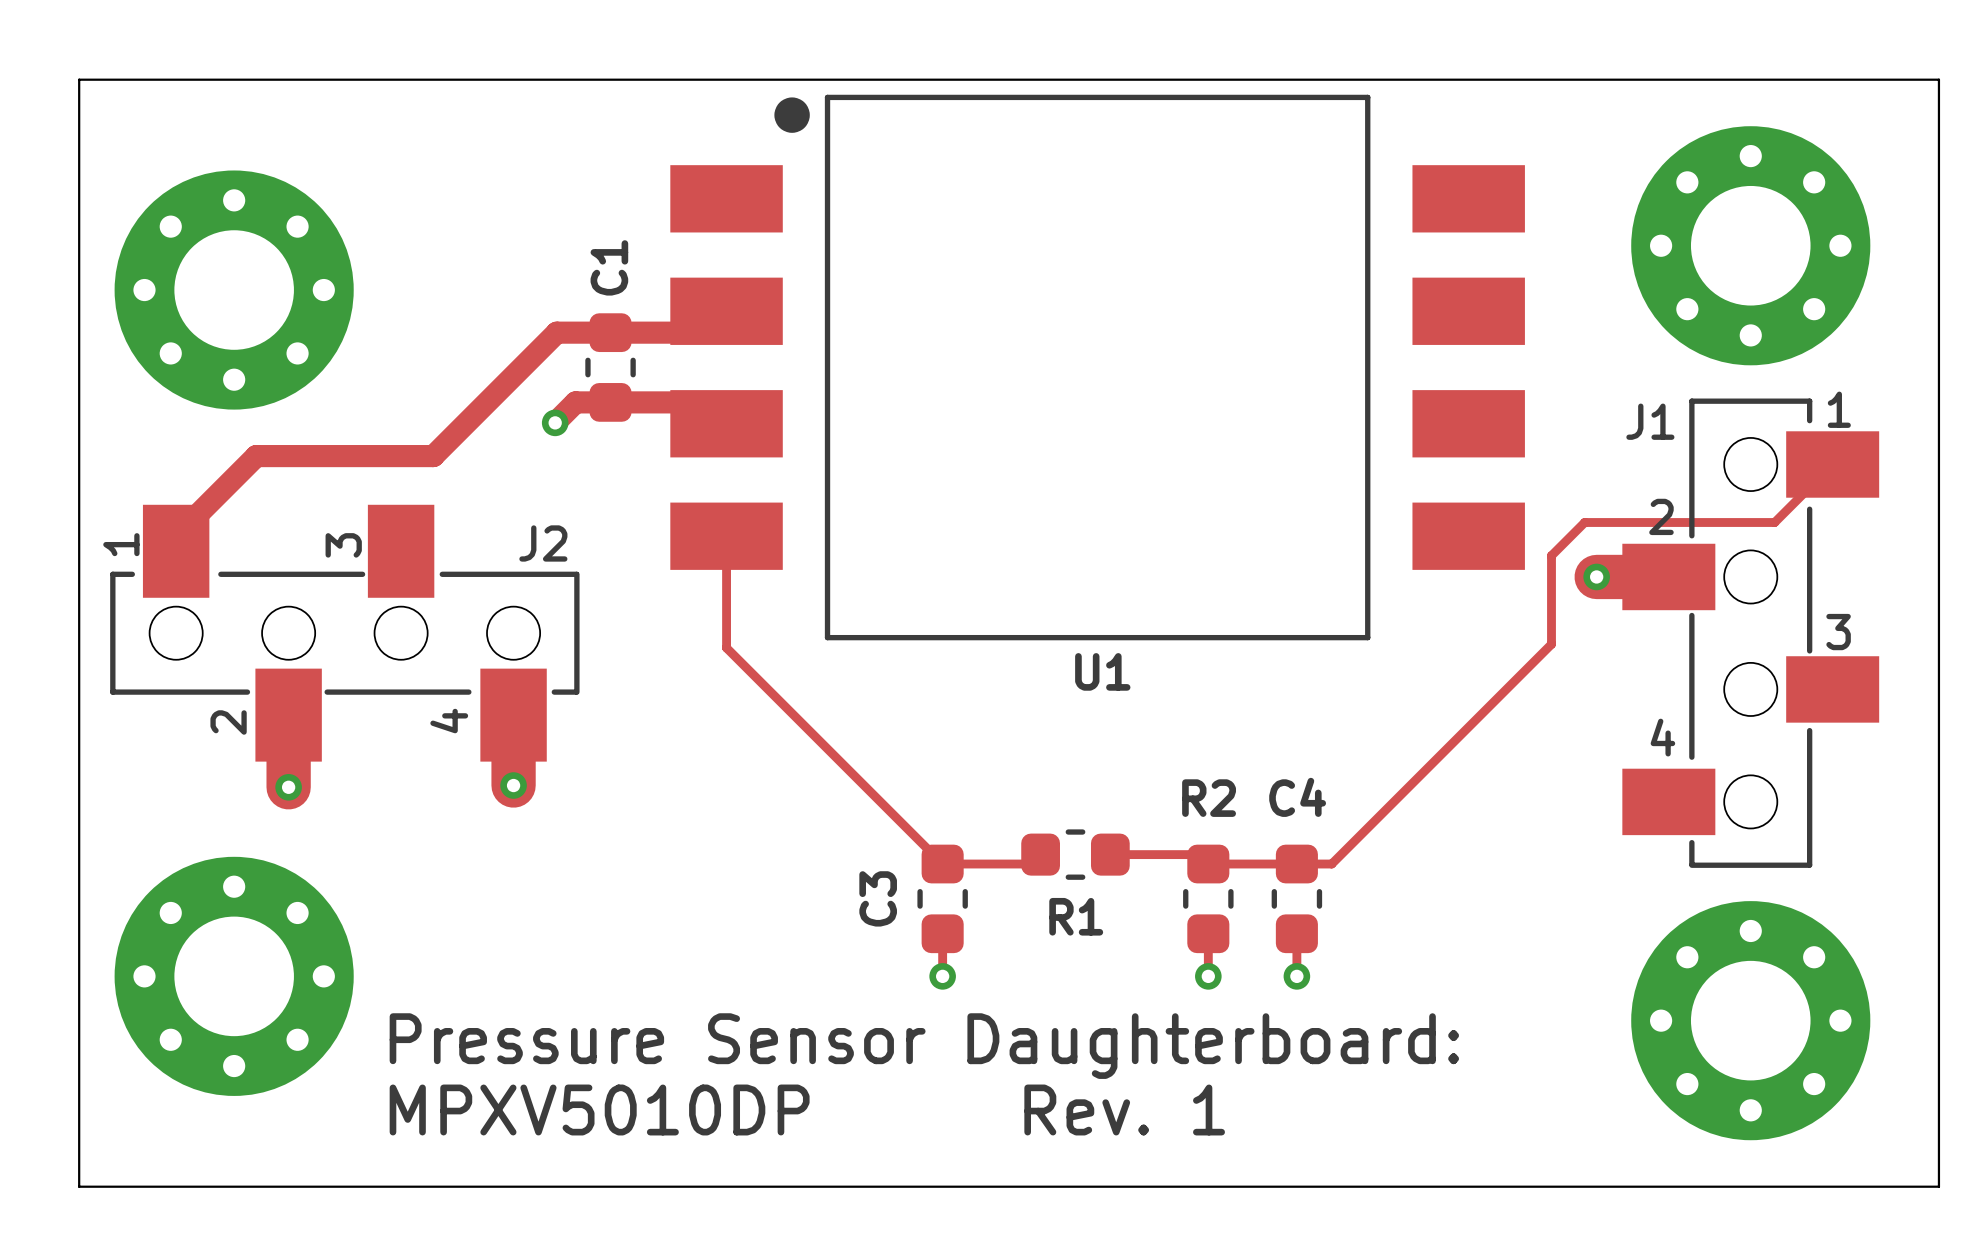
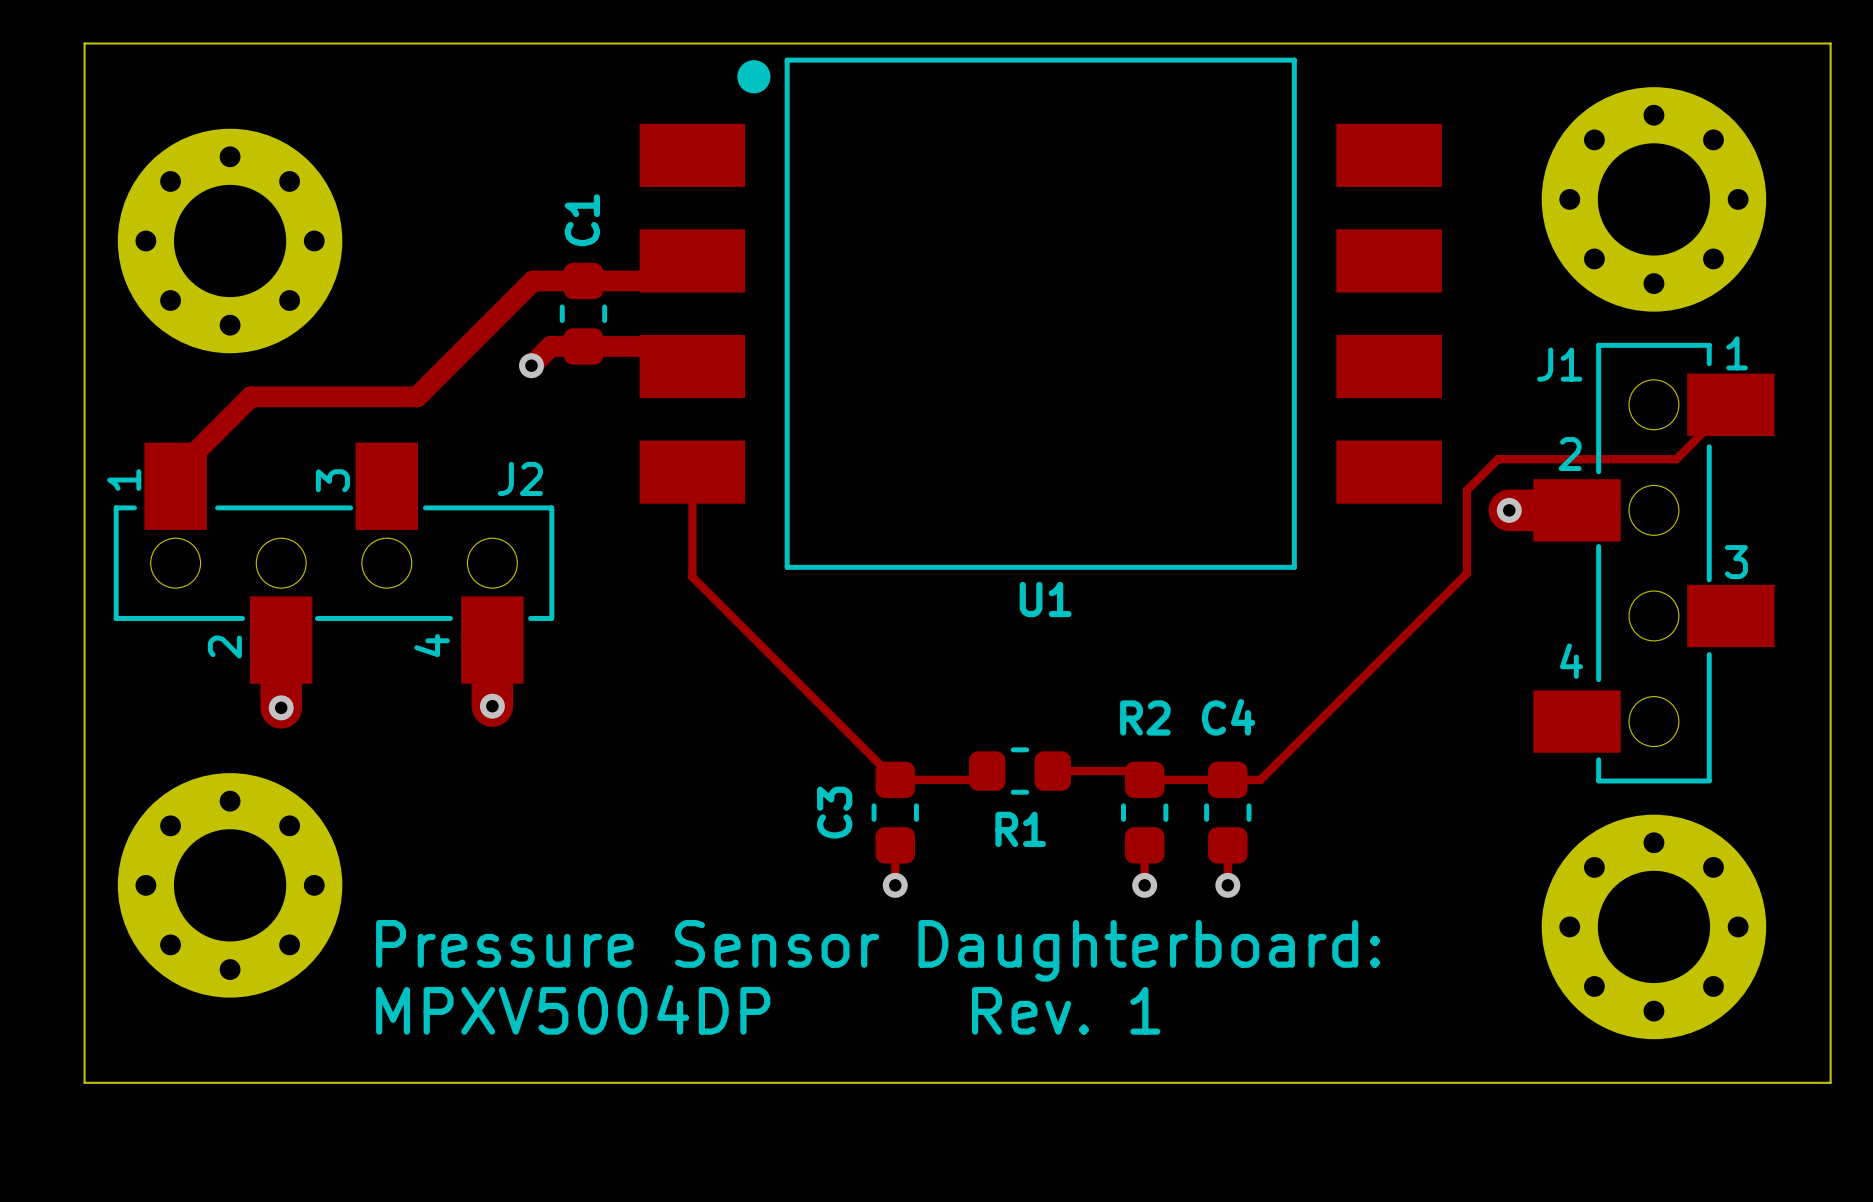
text: MPXV5010DP Rev. 1 (807, 1110) -> MPXV5004DP Rev. 1 (768, 1009)

